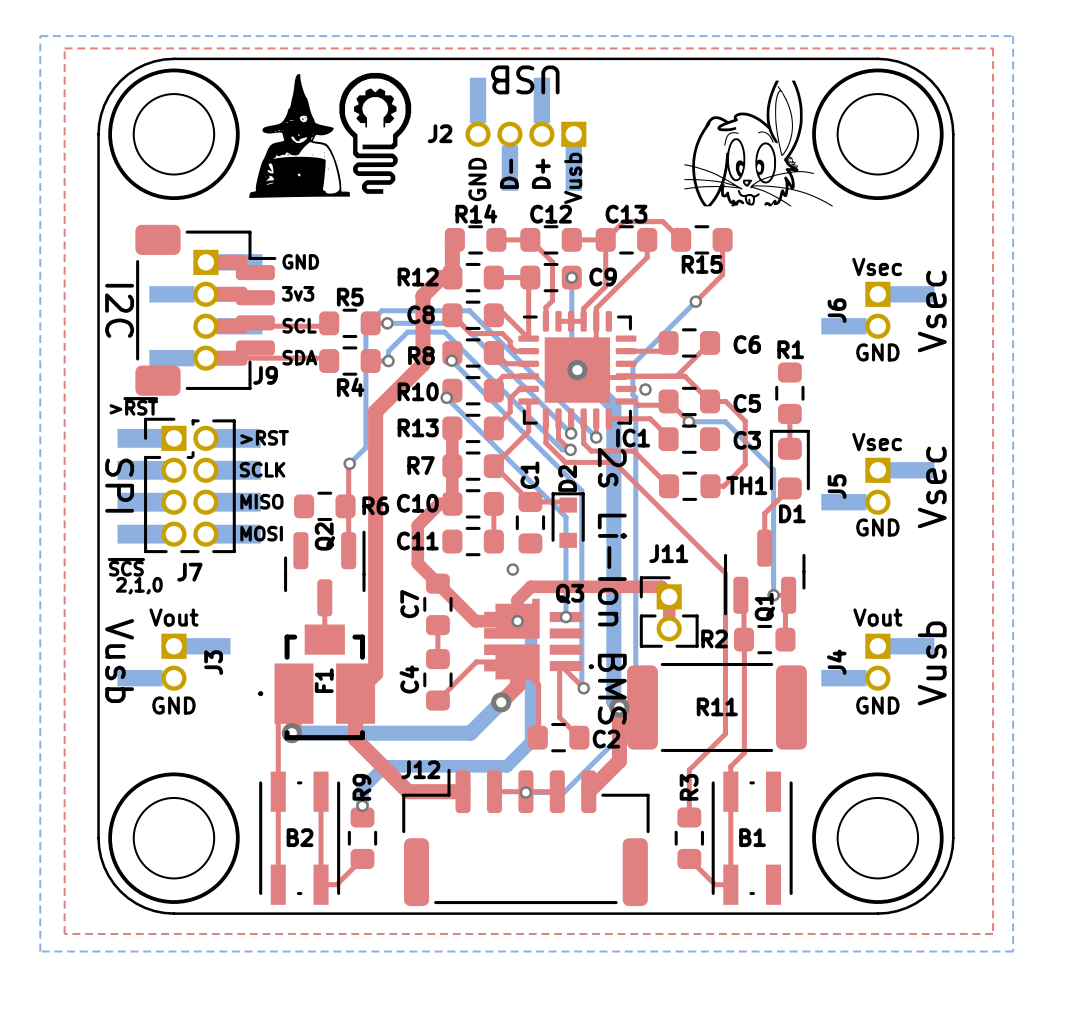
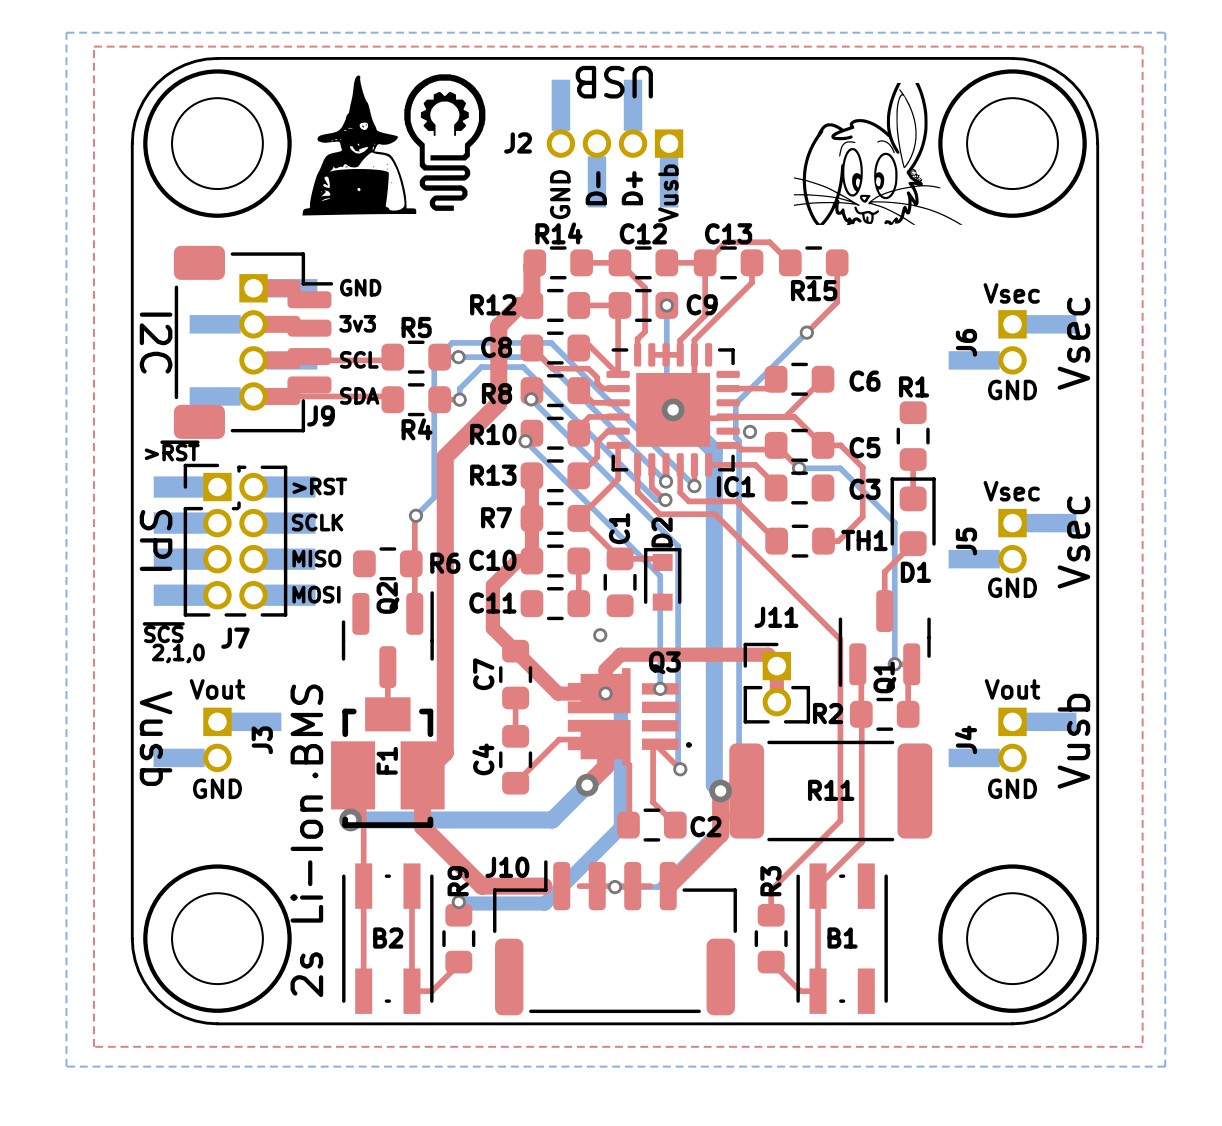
text rotation: 0° (612, 586) -> 180° (306, 840)
text position: 2s Li-Ion BMS (612, 586) -> 2s Li-Ion BMS (306, 840)
top track: (293, 693) (278, 709) (278, 884) -> (353, 775) (363, 786) (363, 991)
bottom track: (531, 739) (506, 766) (384, 766) (362, 788) (362, 805) -> (620, 827) (545, 903) (458, 902)
top track: (619, 745) (619, 761) (588, 791) -> (720, 834) (668, 886)
top track: (730, 766) (730, 884) (715, 884) (689, 858) -> (846, 857) (818, 886) (818, 991) (800, 991) (771, 962)
top track: (689, 770) (689, 817) -> (799, 861) (771, 890) (771, 915)
top track: (321, 791) (321, 884) (336, 884) (362, 858) -> none
top track: none -> (411, 886) (411, 991) (432, 991) (457, 966)
via position: (362, 805) -> (458, 902)
J12: (525, 837) -> none
J10: none -> (614, 937)
B2 position: (299, 838) -> (387, 938)
R9 position: (362, 838) -> (458, 938)
R3 position: (689, 838) -> (771, 938)
B1 position: (752, 838) -> (842, 938)

